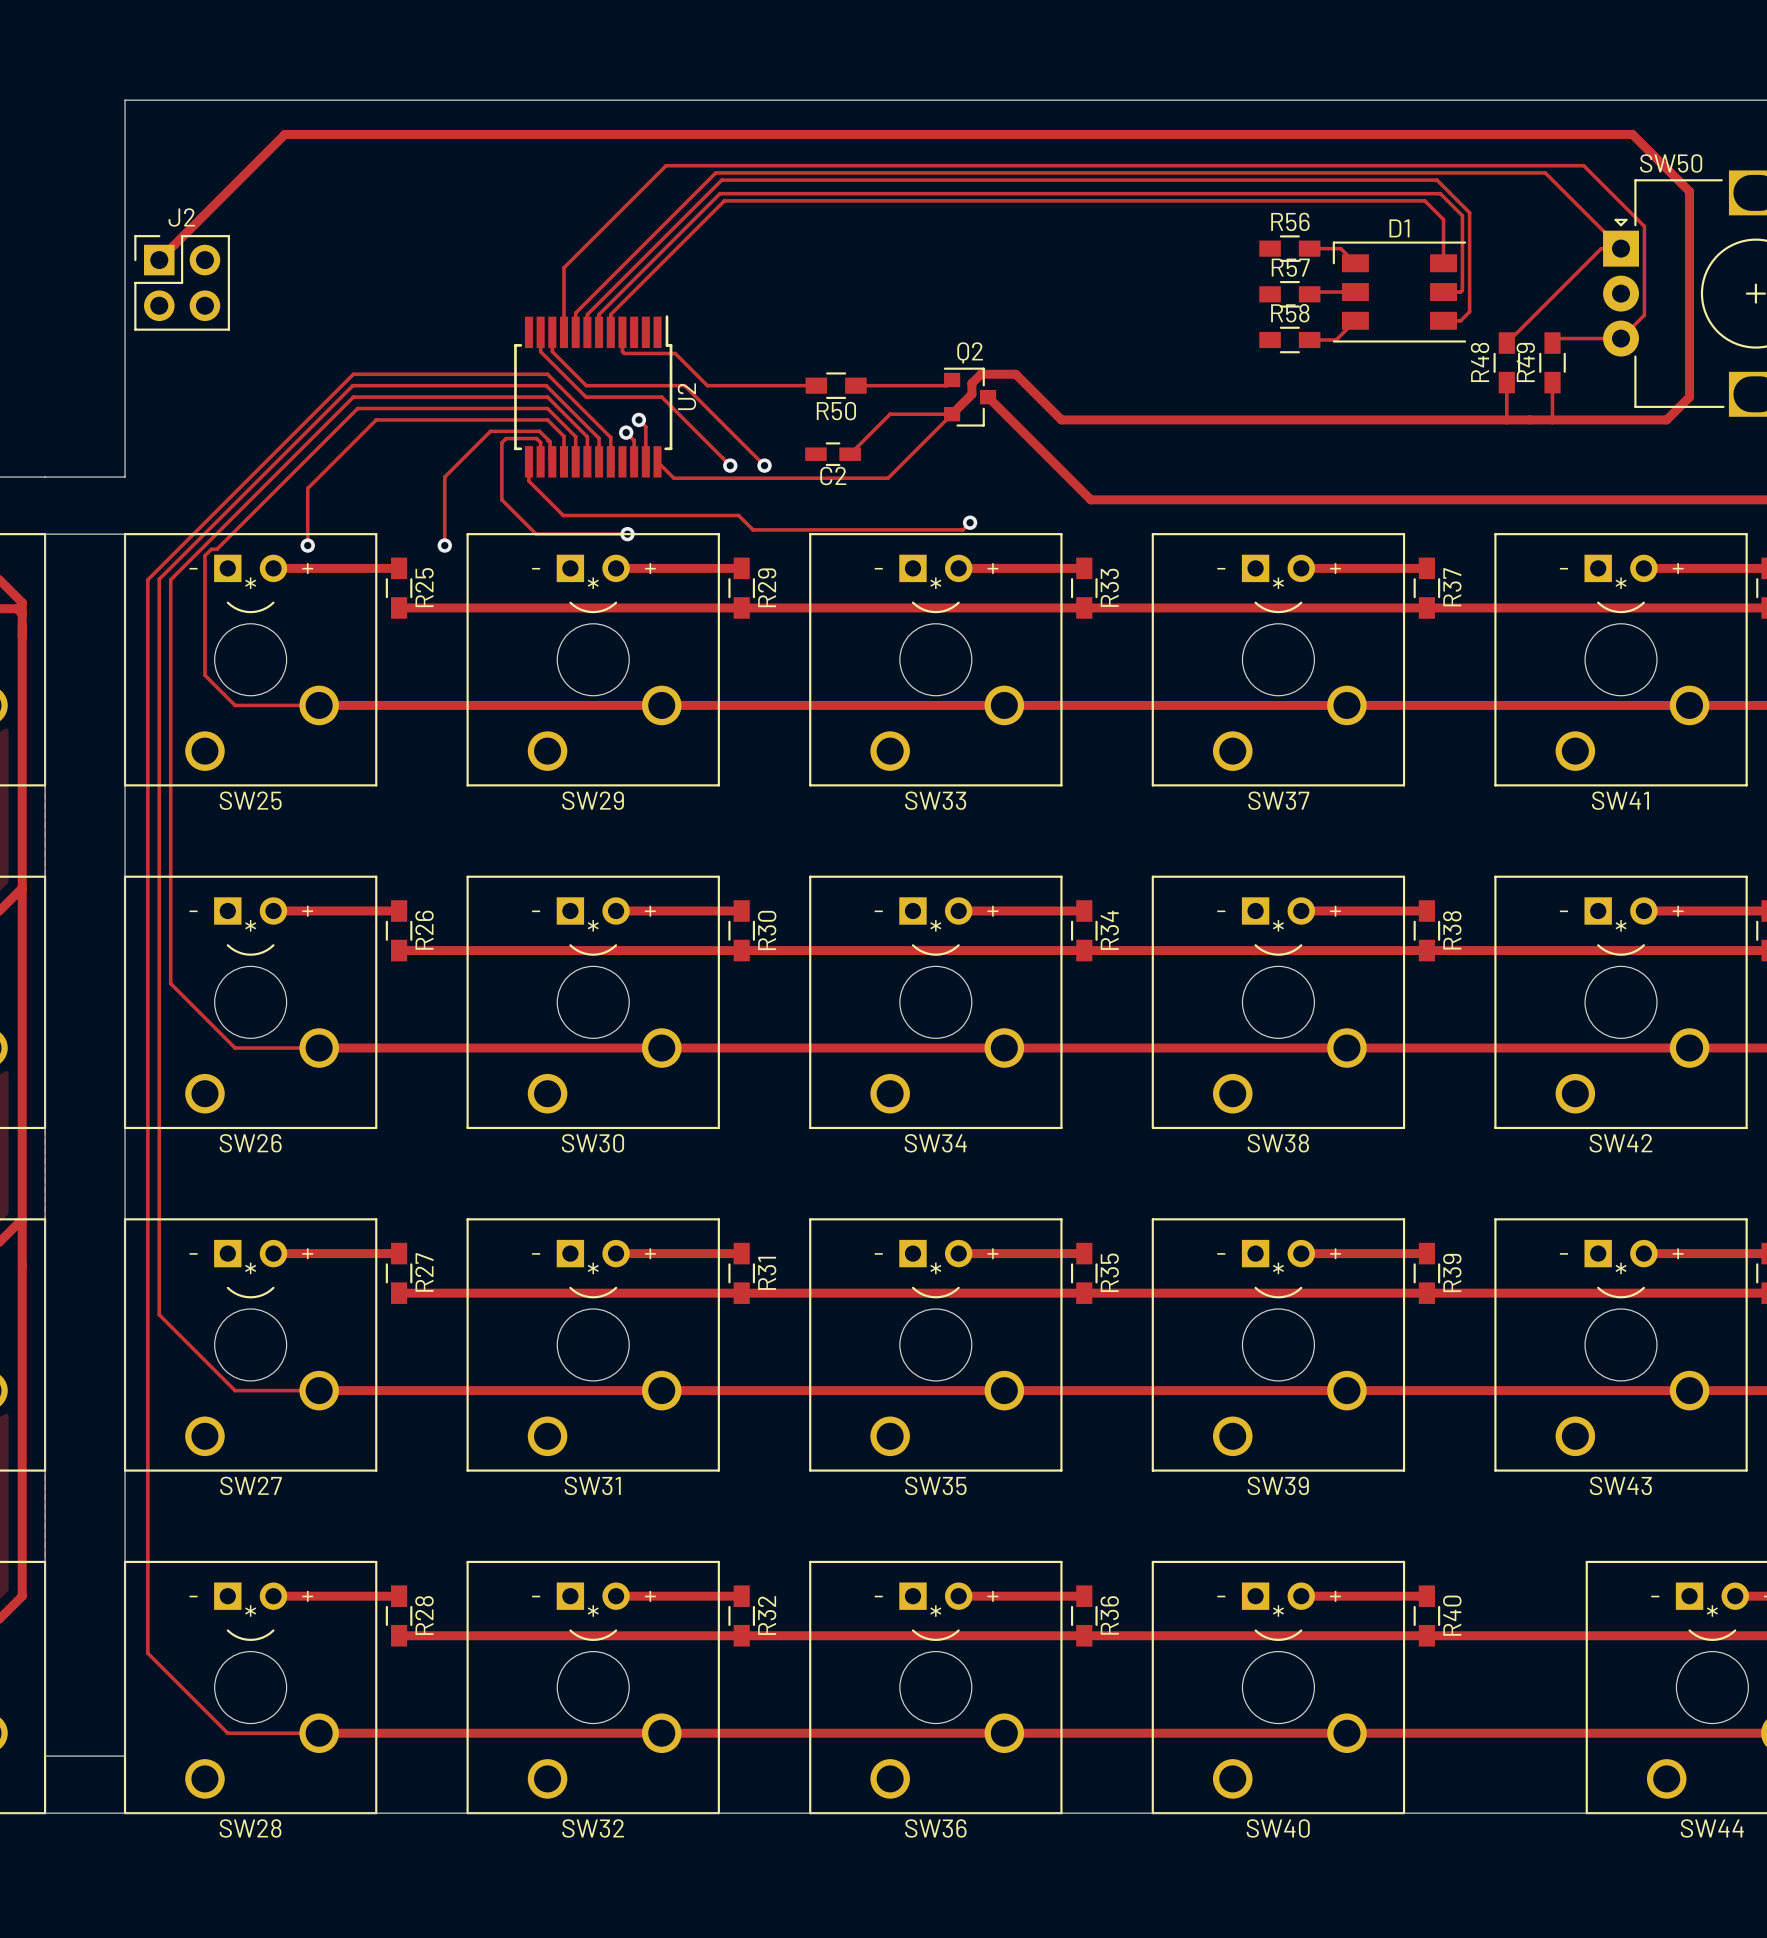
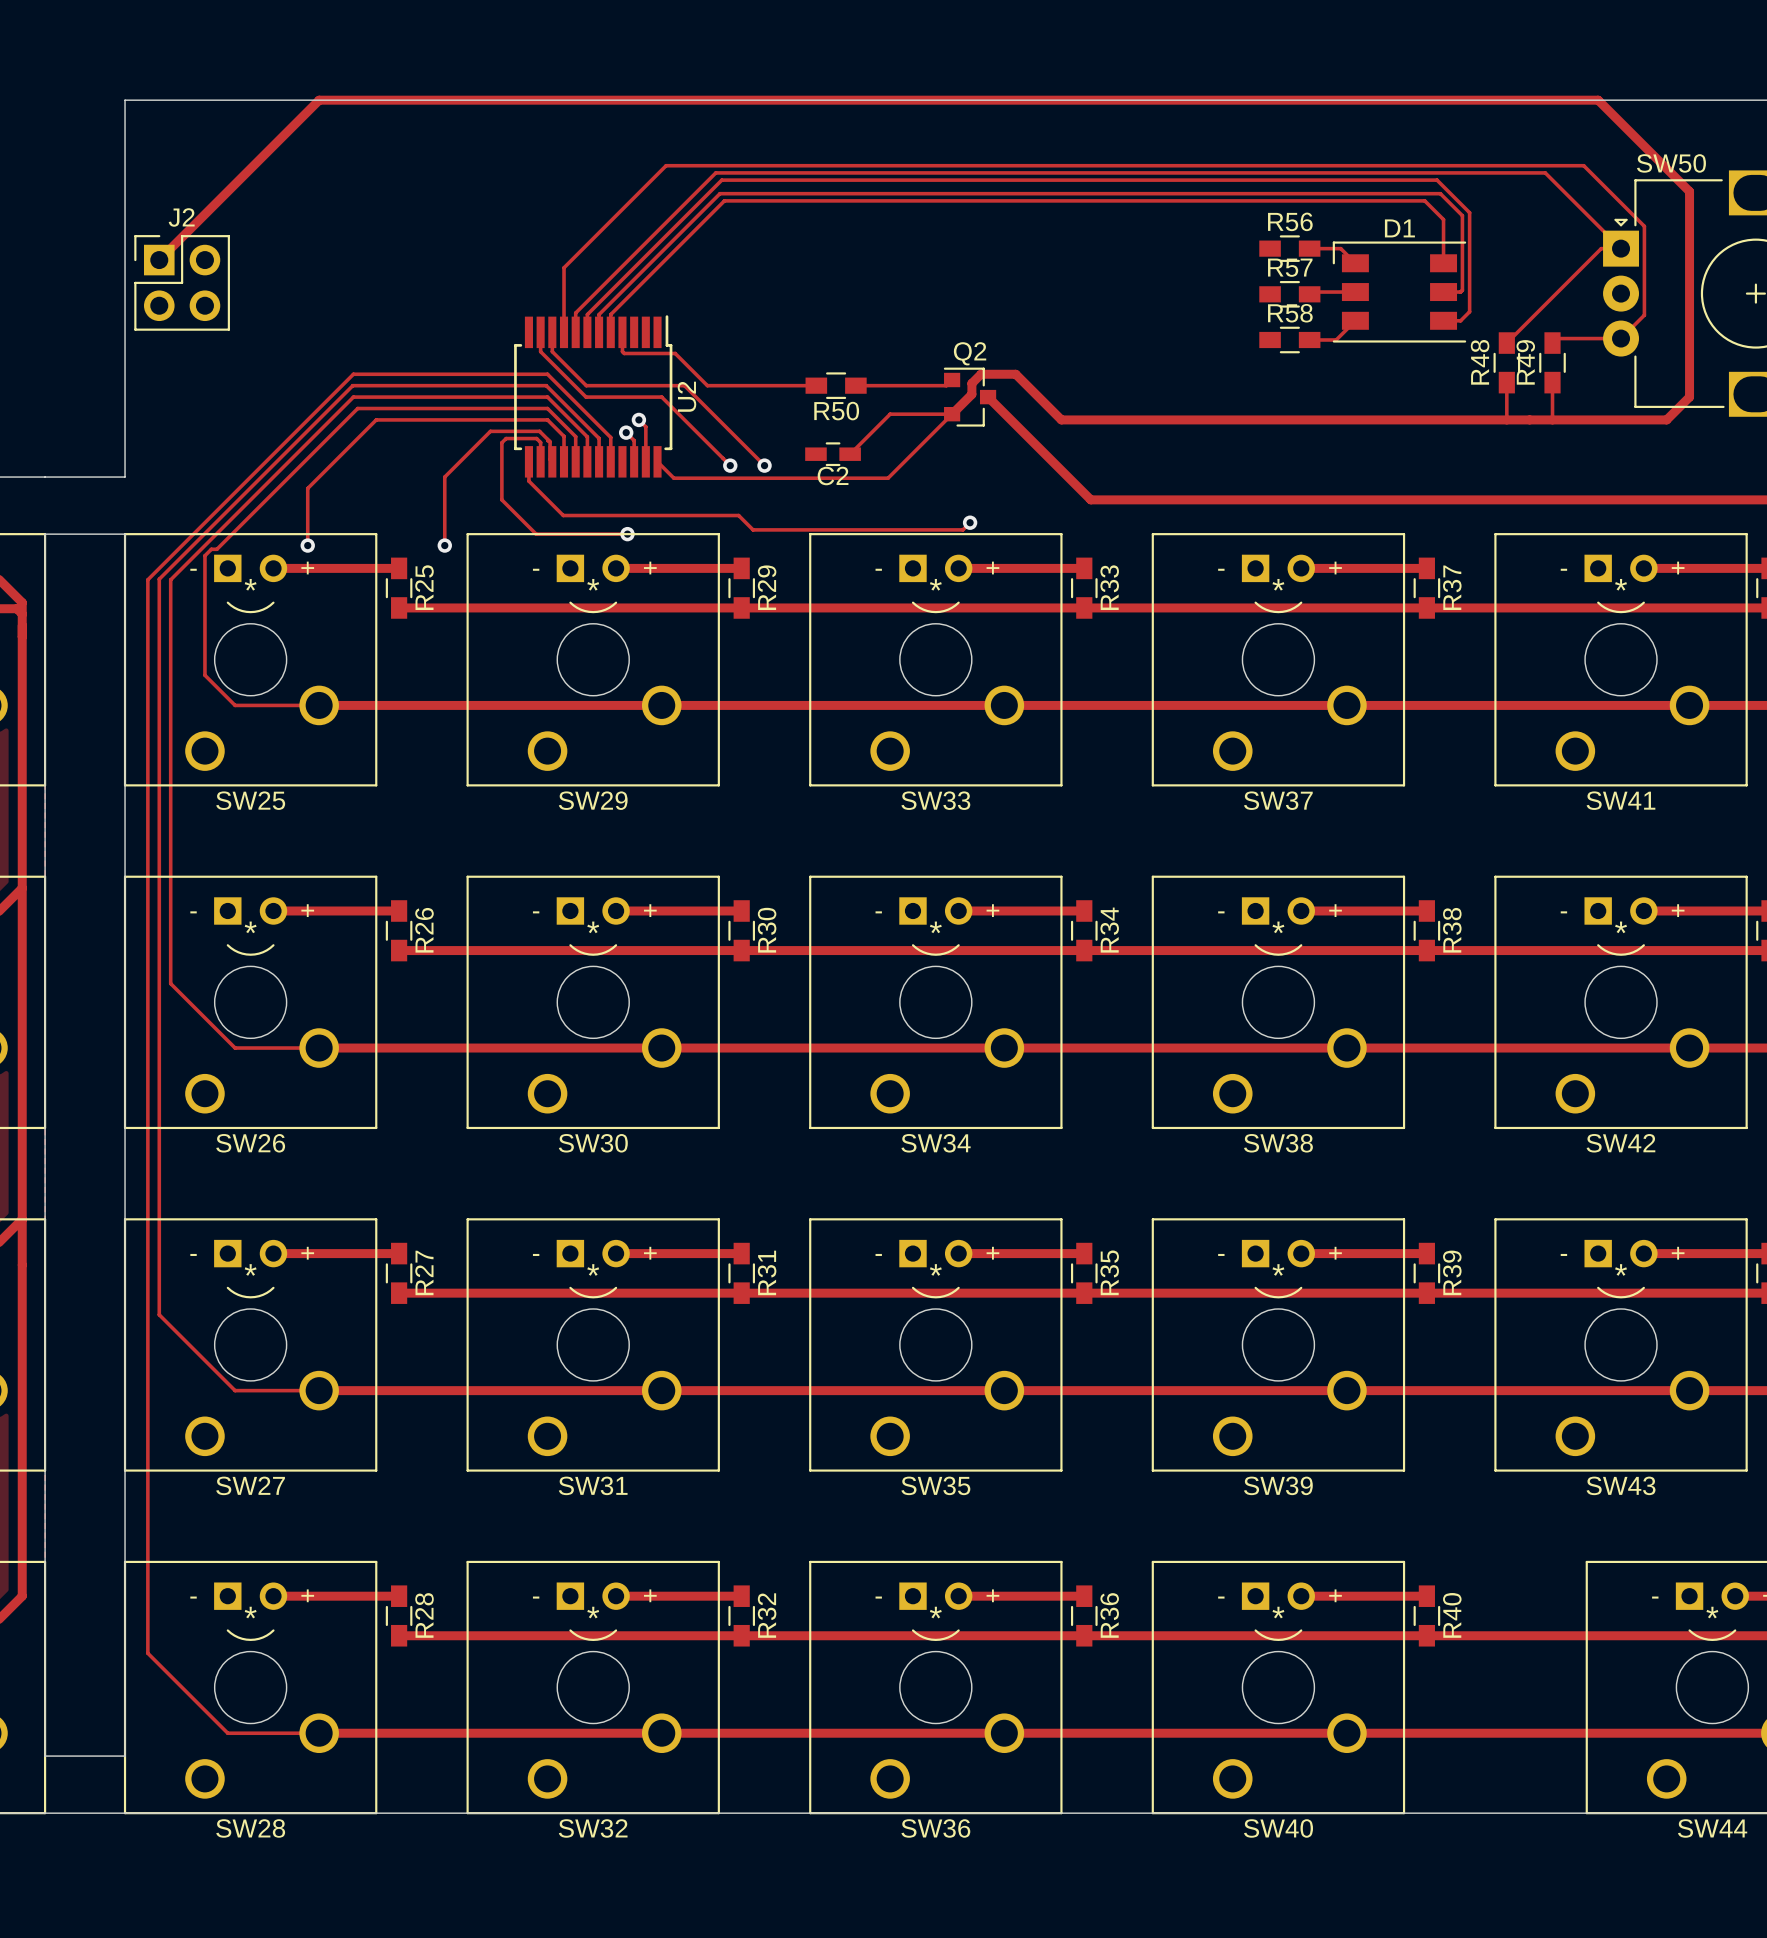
track: (284, 134) (1632, 134) -> (284, 134) (319, 100) (1598, 100) (1632, 134)

